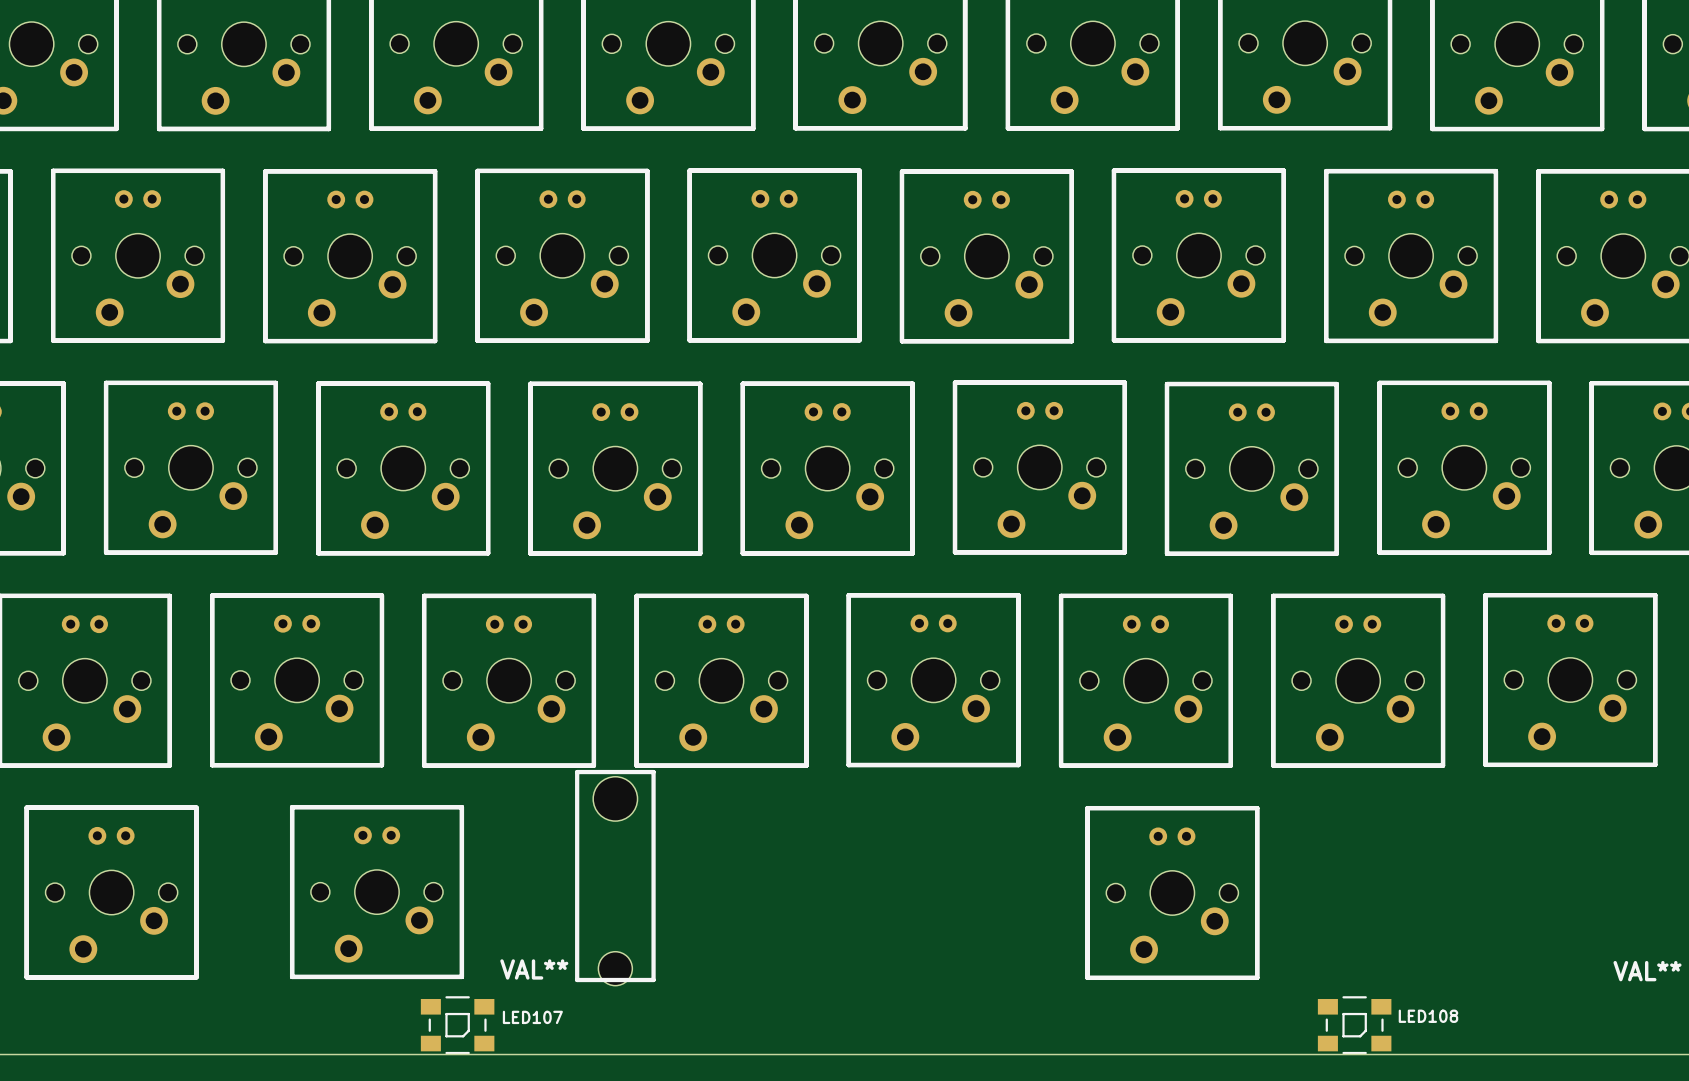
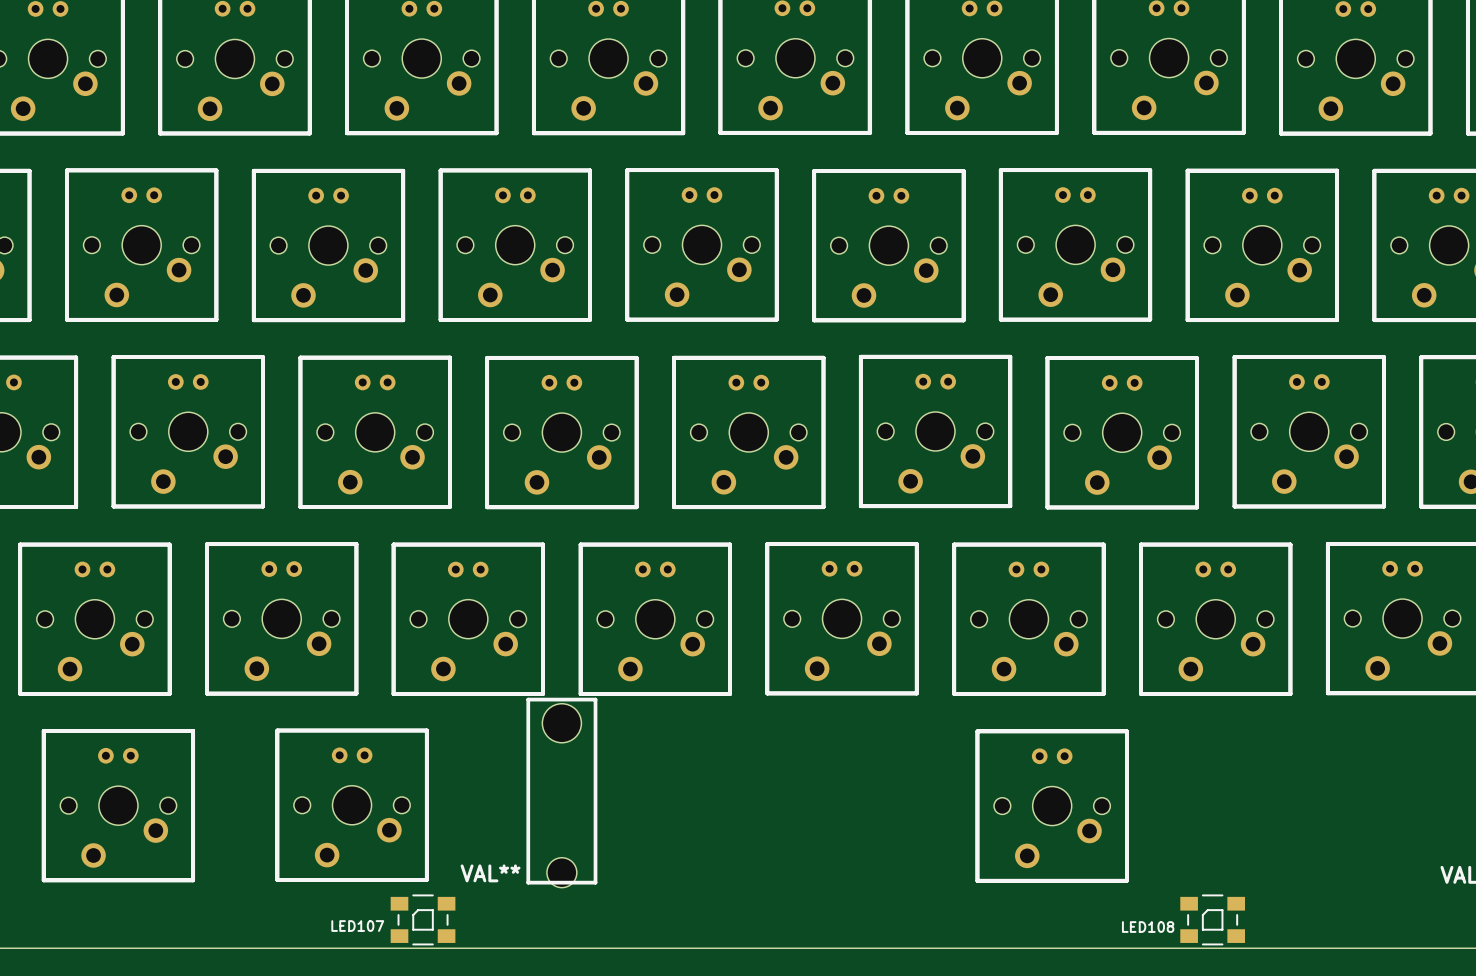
LED107 rotation: 0° (457, 1025) -> 180° (423, 919)
LED108 rotation: 0° (1354, 1025) -> 180° (1212, 919)

